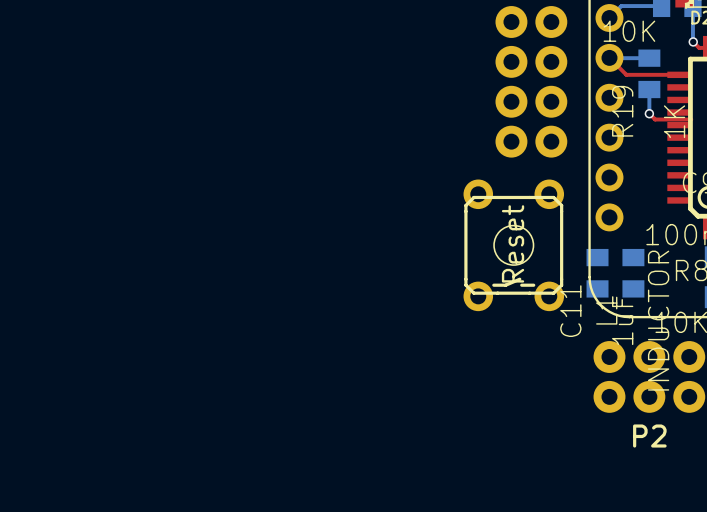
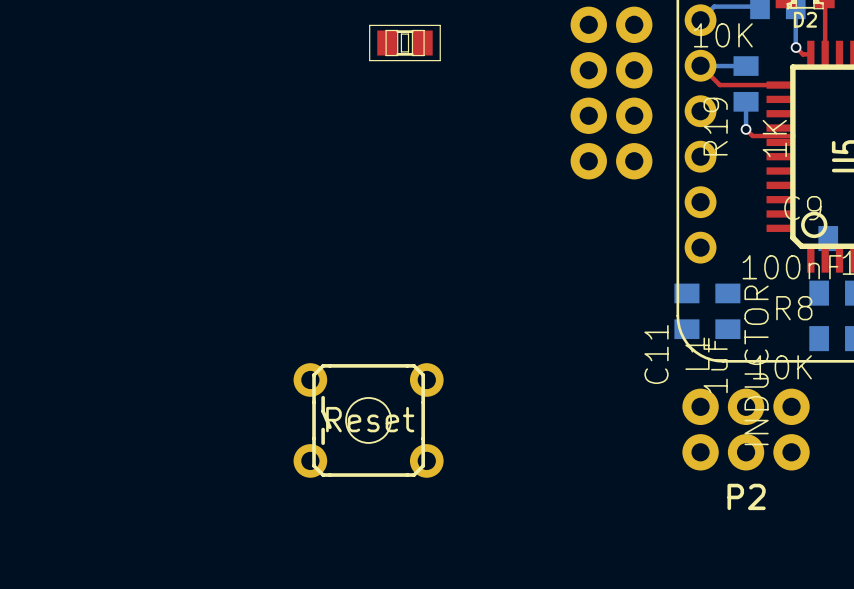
part: none -> (404, 43)
part rotation: 0° (513, 245) -> 90° clockwise (368, 420)
part position: (513, 245) -> (368, 420)

